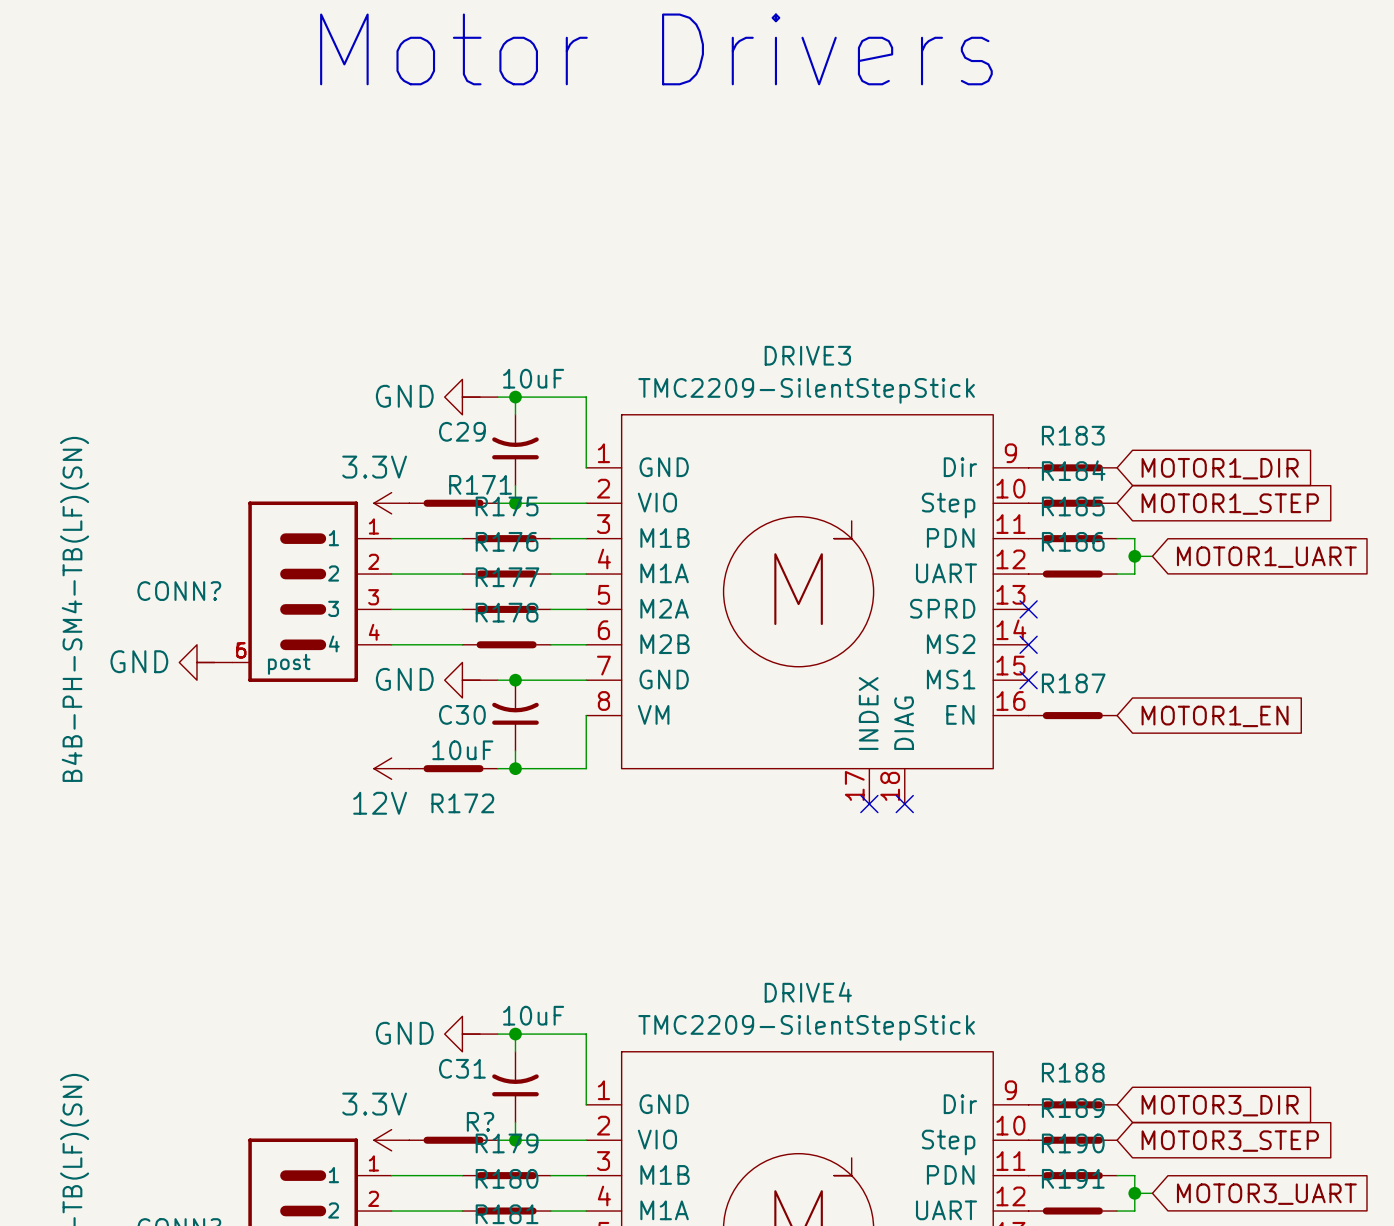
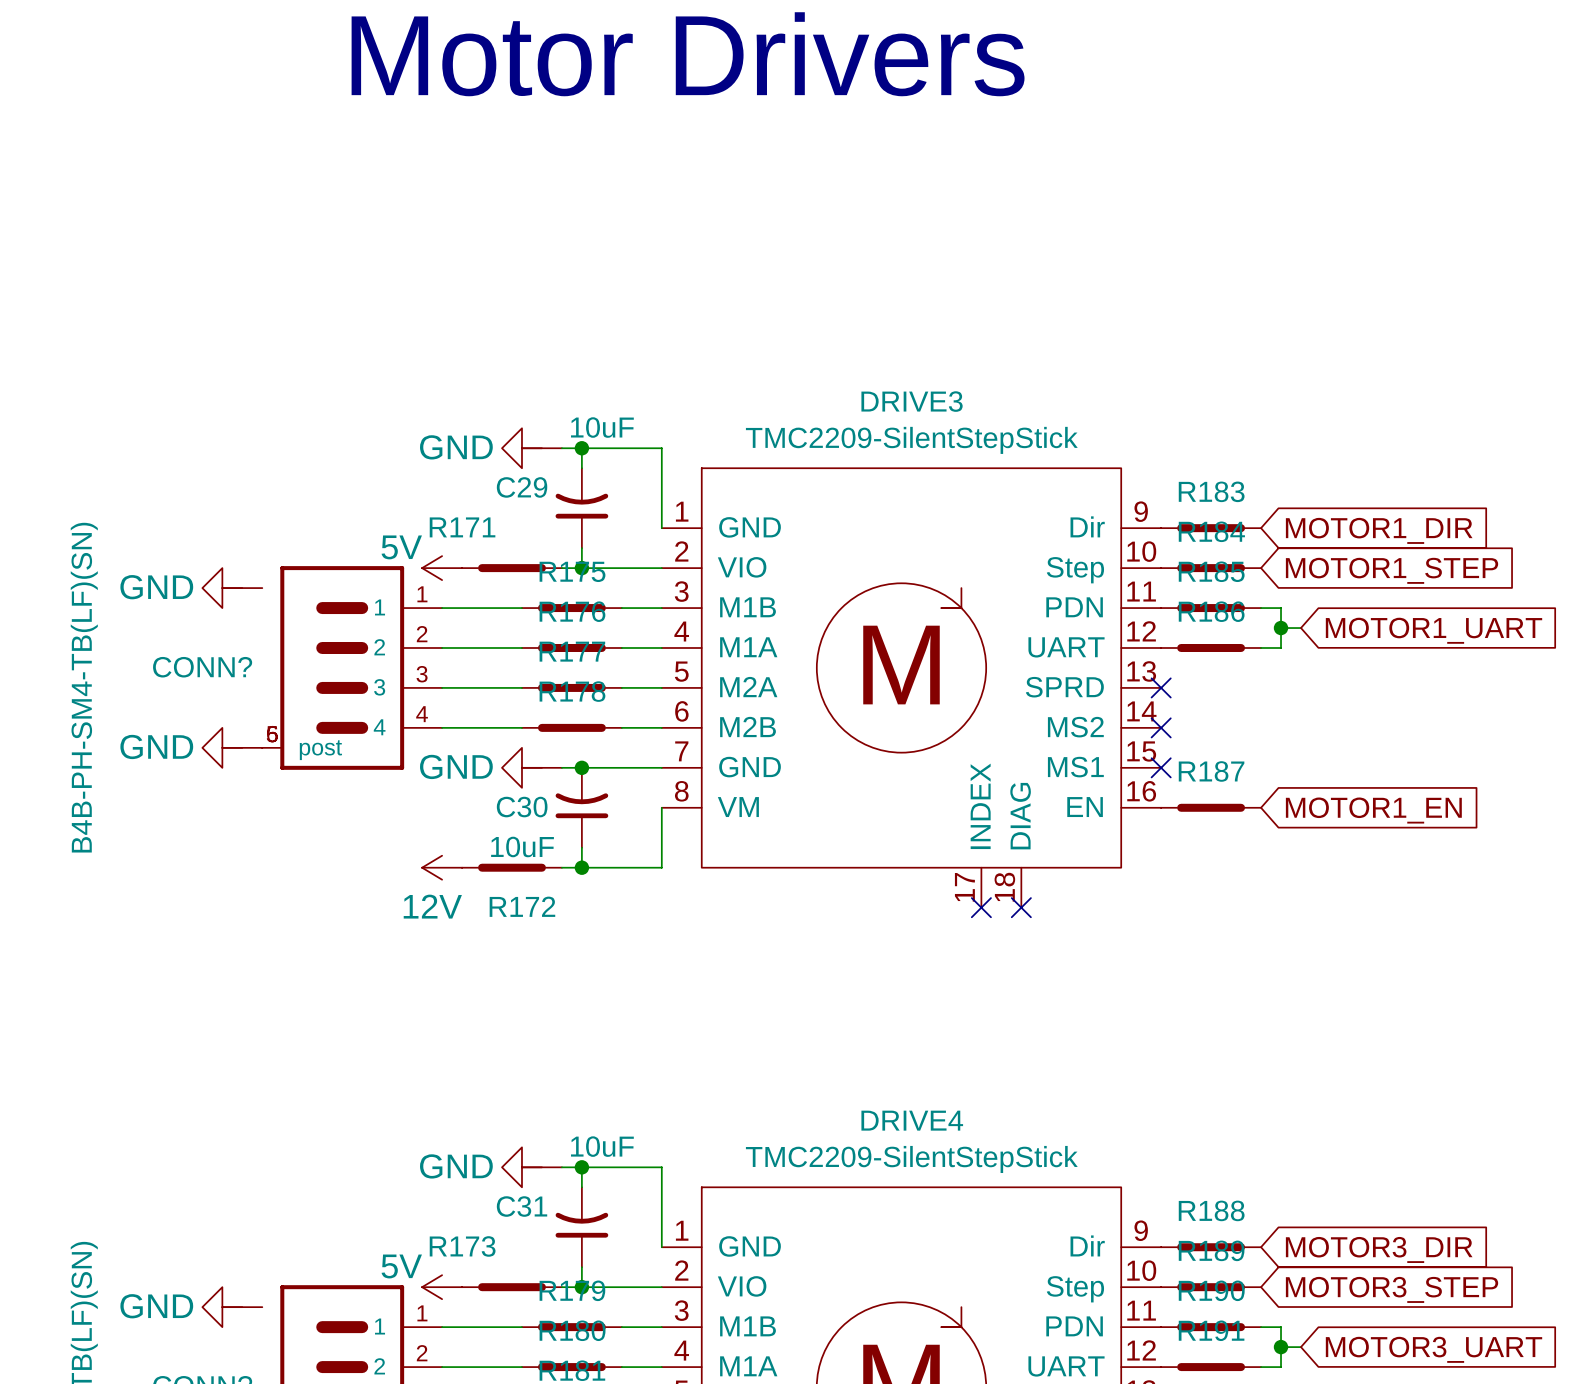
R171 name position: R171 (480, 484) -> R171 (462, 527)
power symbol: 3.3V (391, 503) -> 5V (442, 568)
power symbol: none -> GND (232, 588)
R? name: R? (480, 1121) -> R173 (462, 1246)
power symbol: 3.3V (391, 1140) -> 5V (442, 1287)
power symbol: none -> GND (232, 1307)

